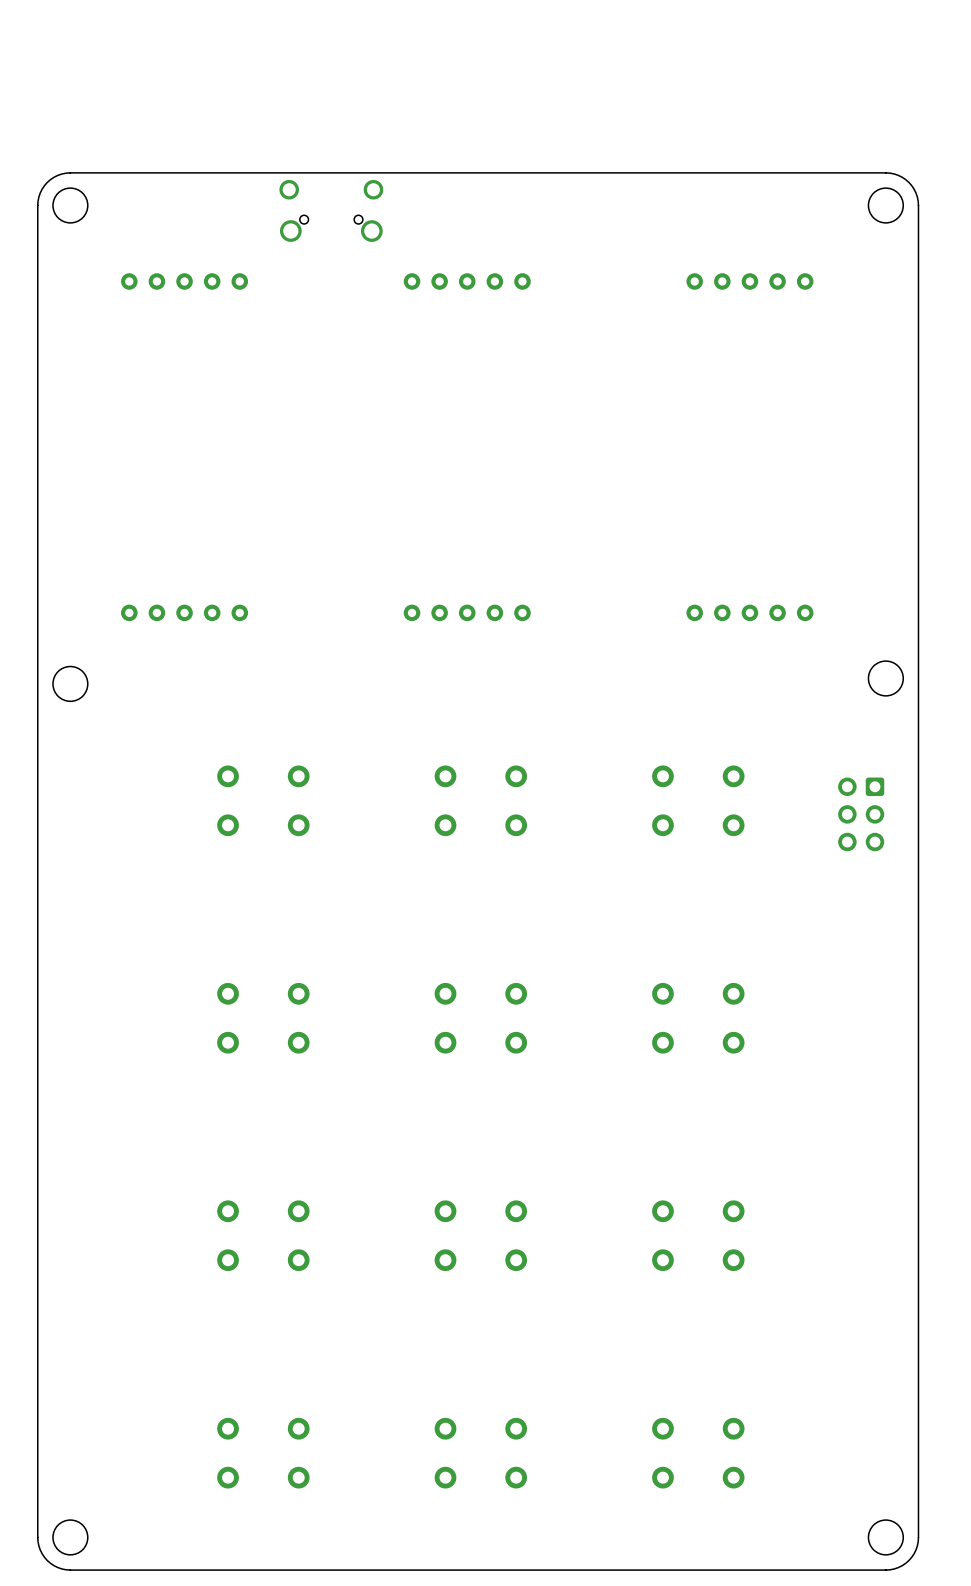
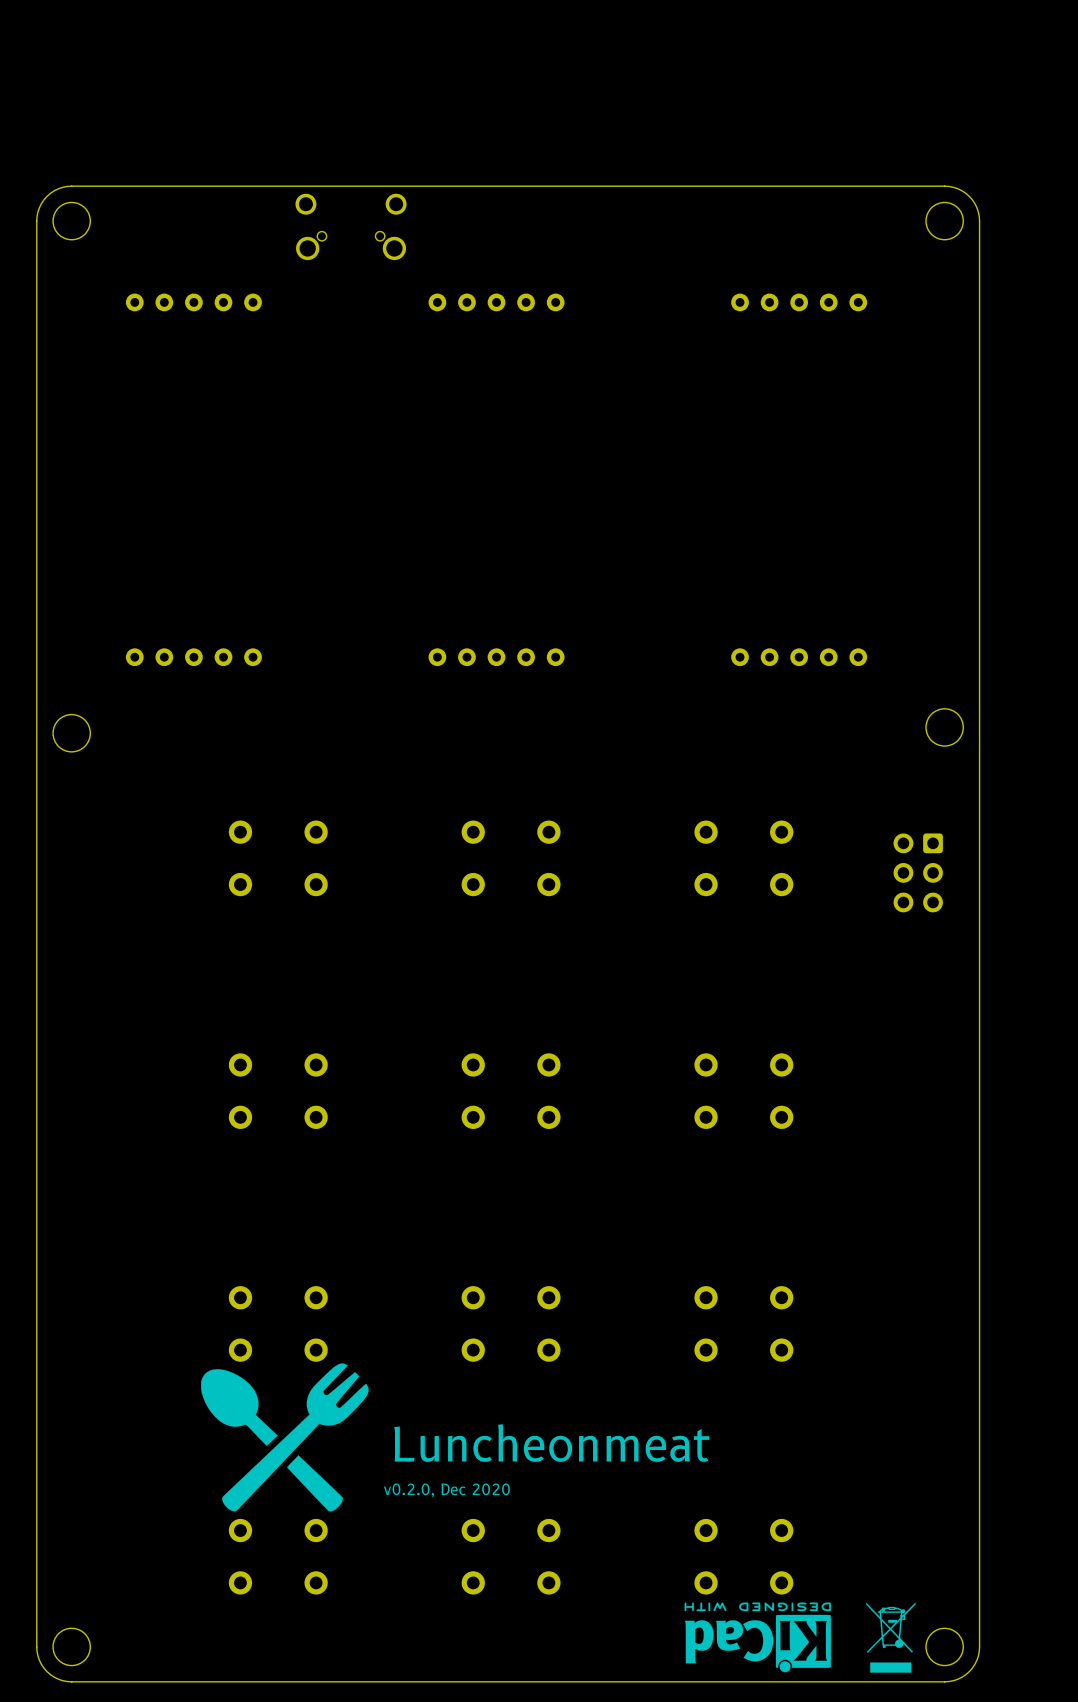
drawing: none -> [201, 1363, 369, 1512]
text: none -> Luncheonmeat (551, 1443)
text: none -> v0.2.0, Dec 2020 (446, 1490)
drawing: none -> [684, 1602, 831, 1673]
drawing: none -> [866, 1602, 916, 1673]

